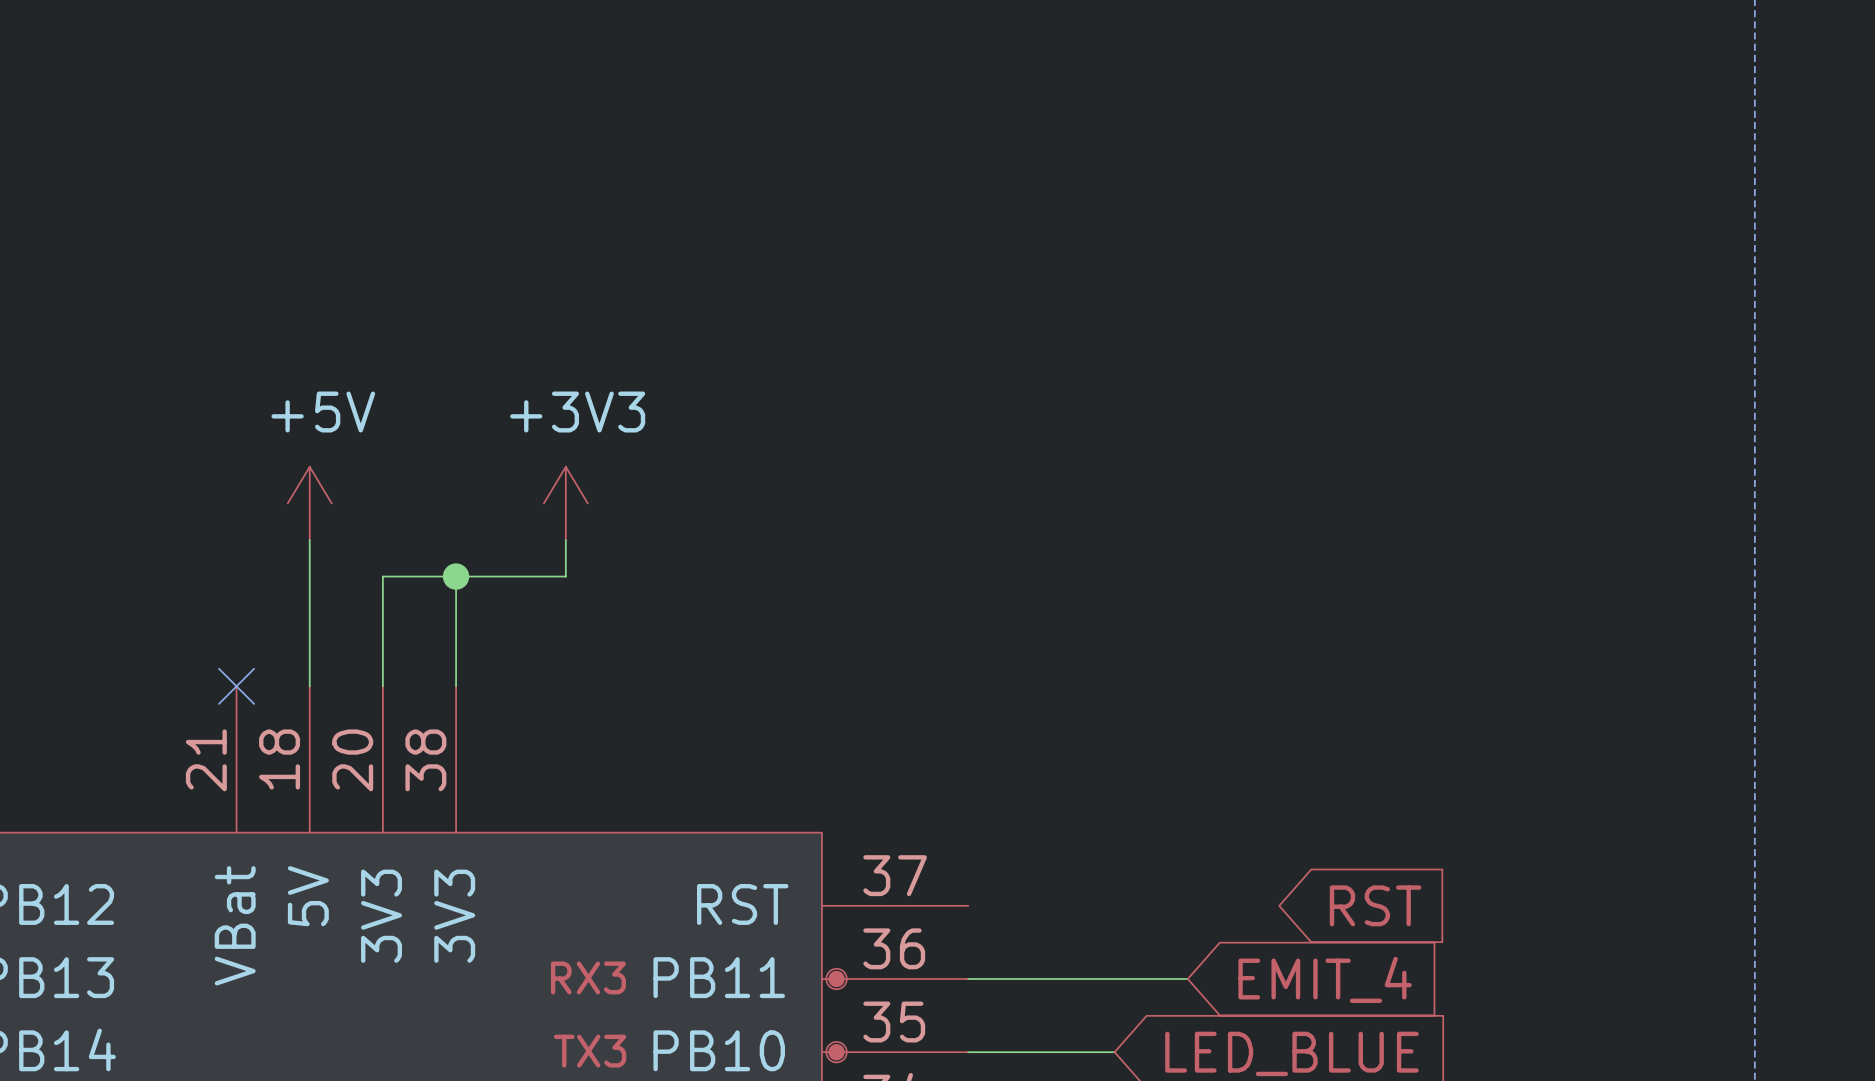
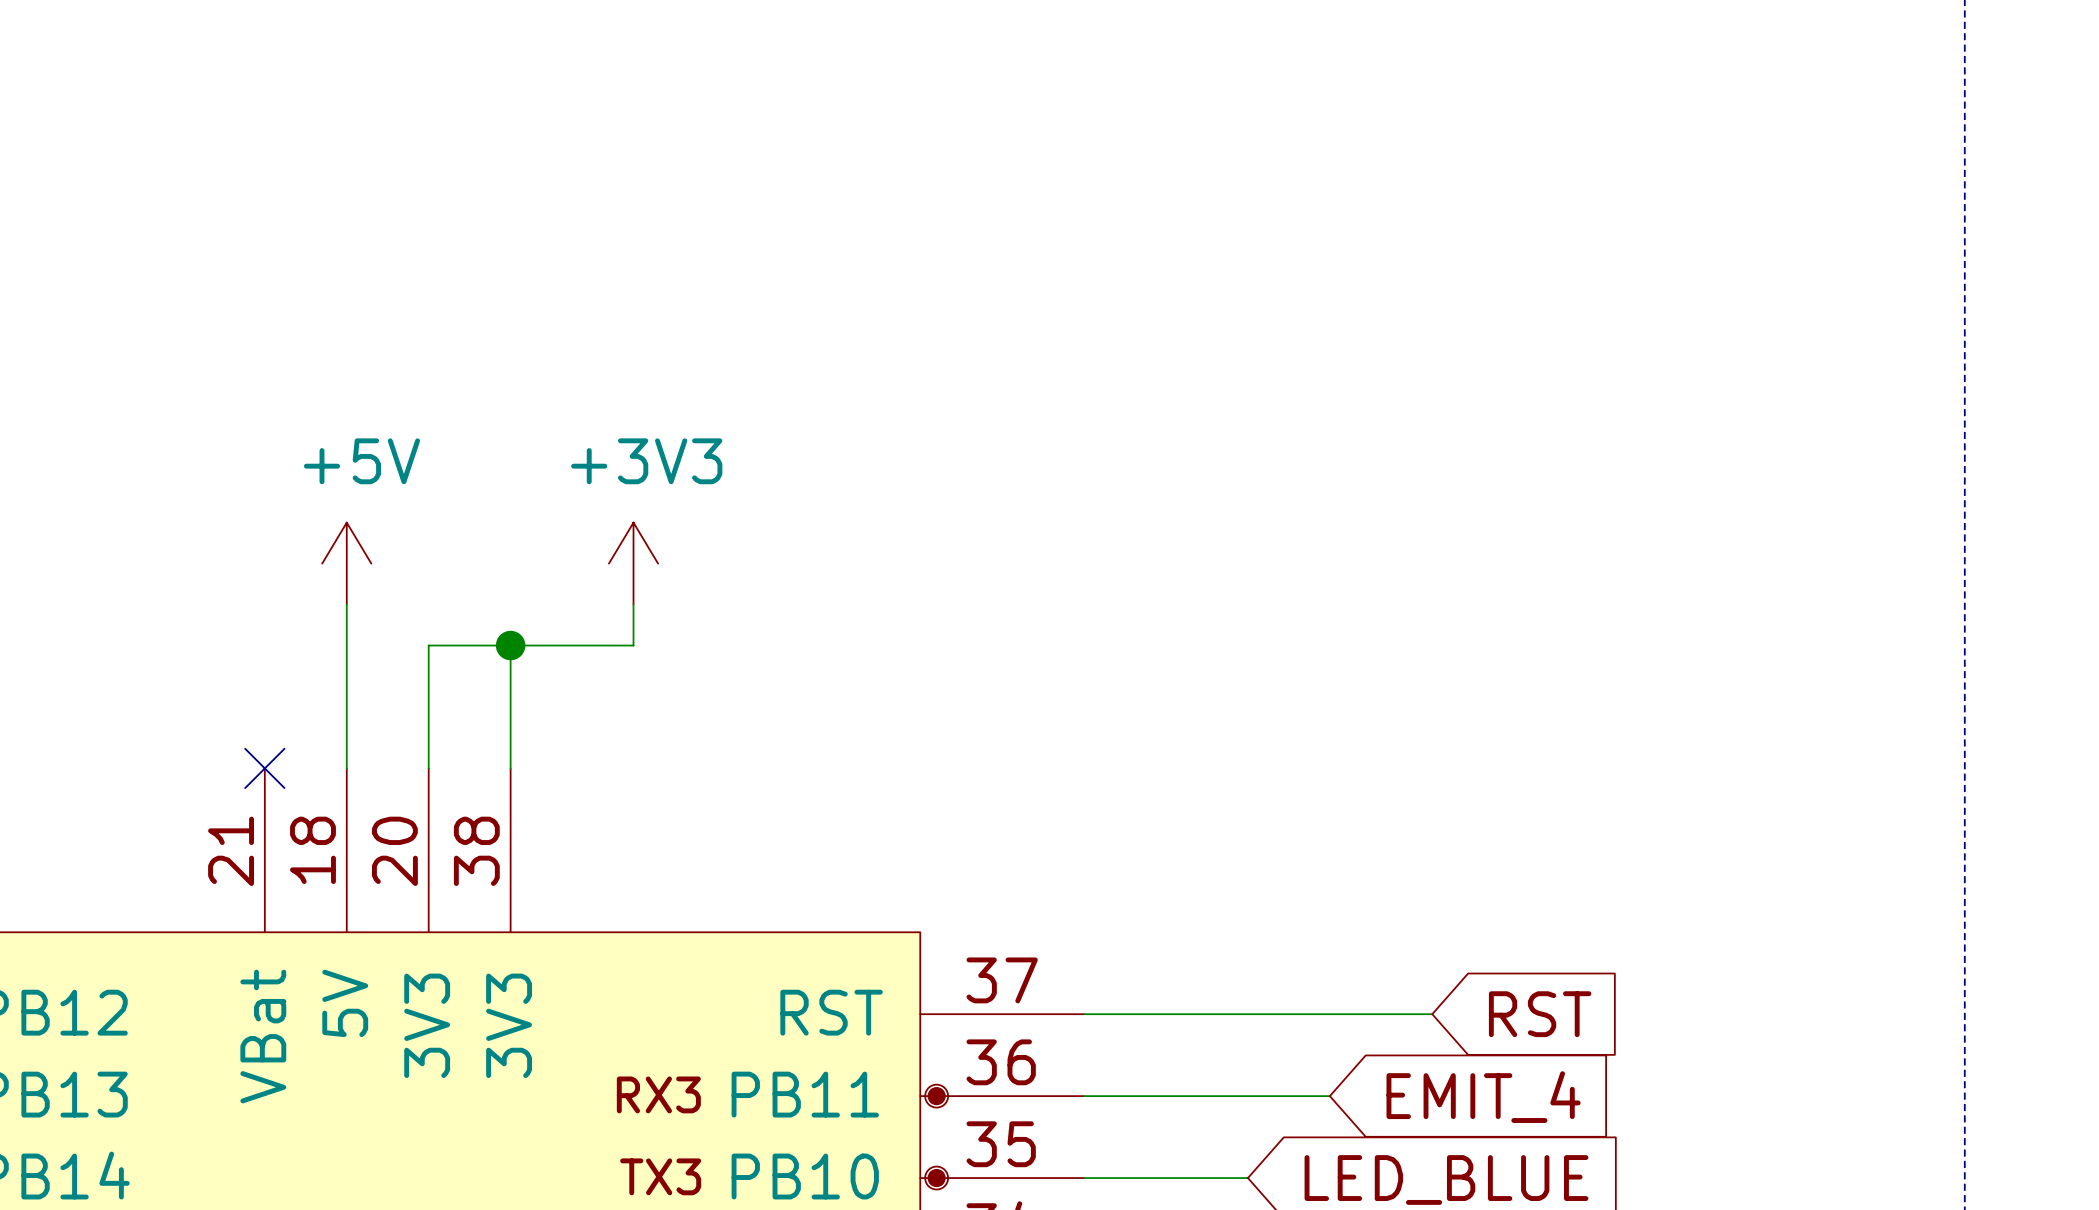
wire: none -> (1084, 1014) (1432, 1014)

